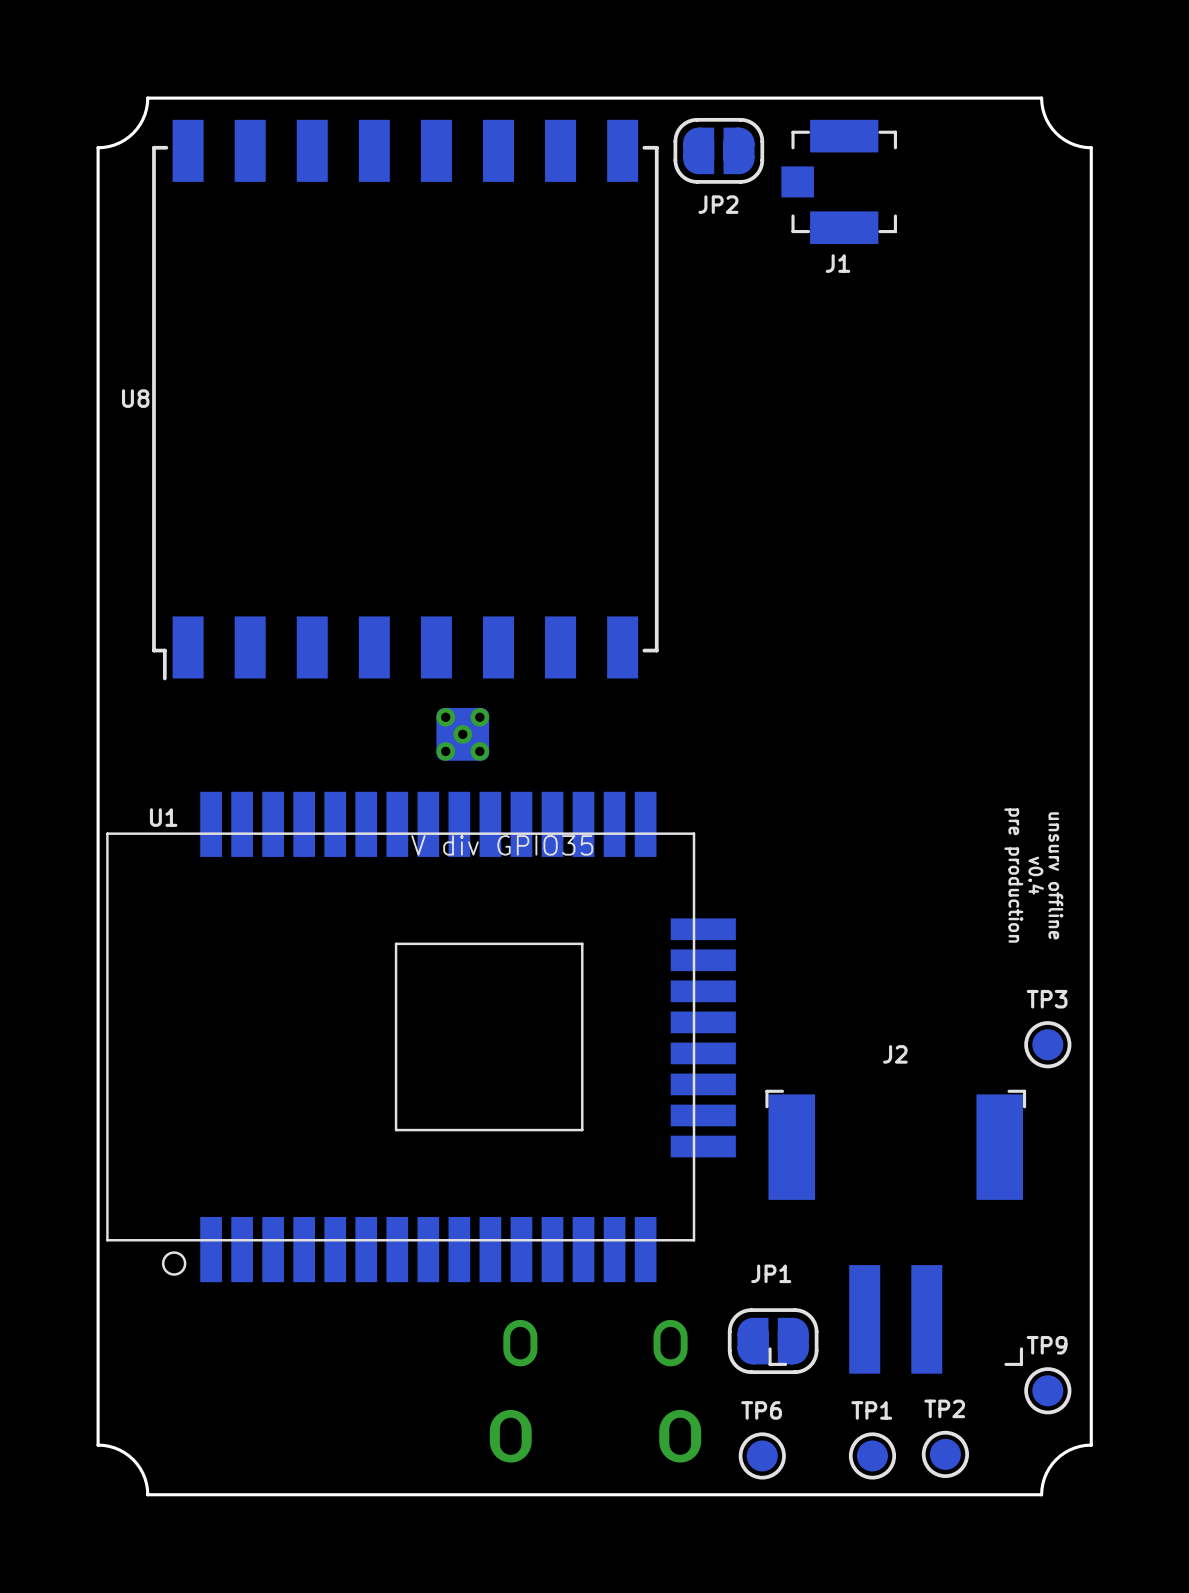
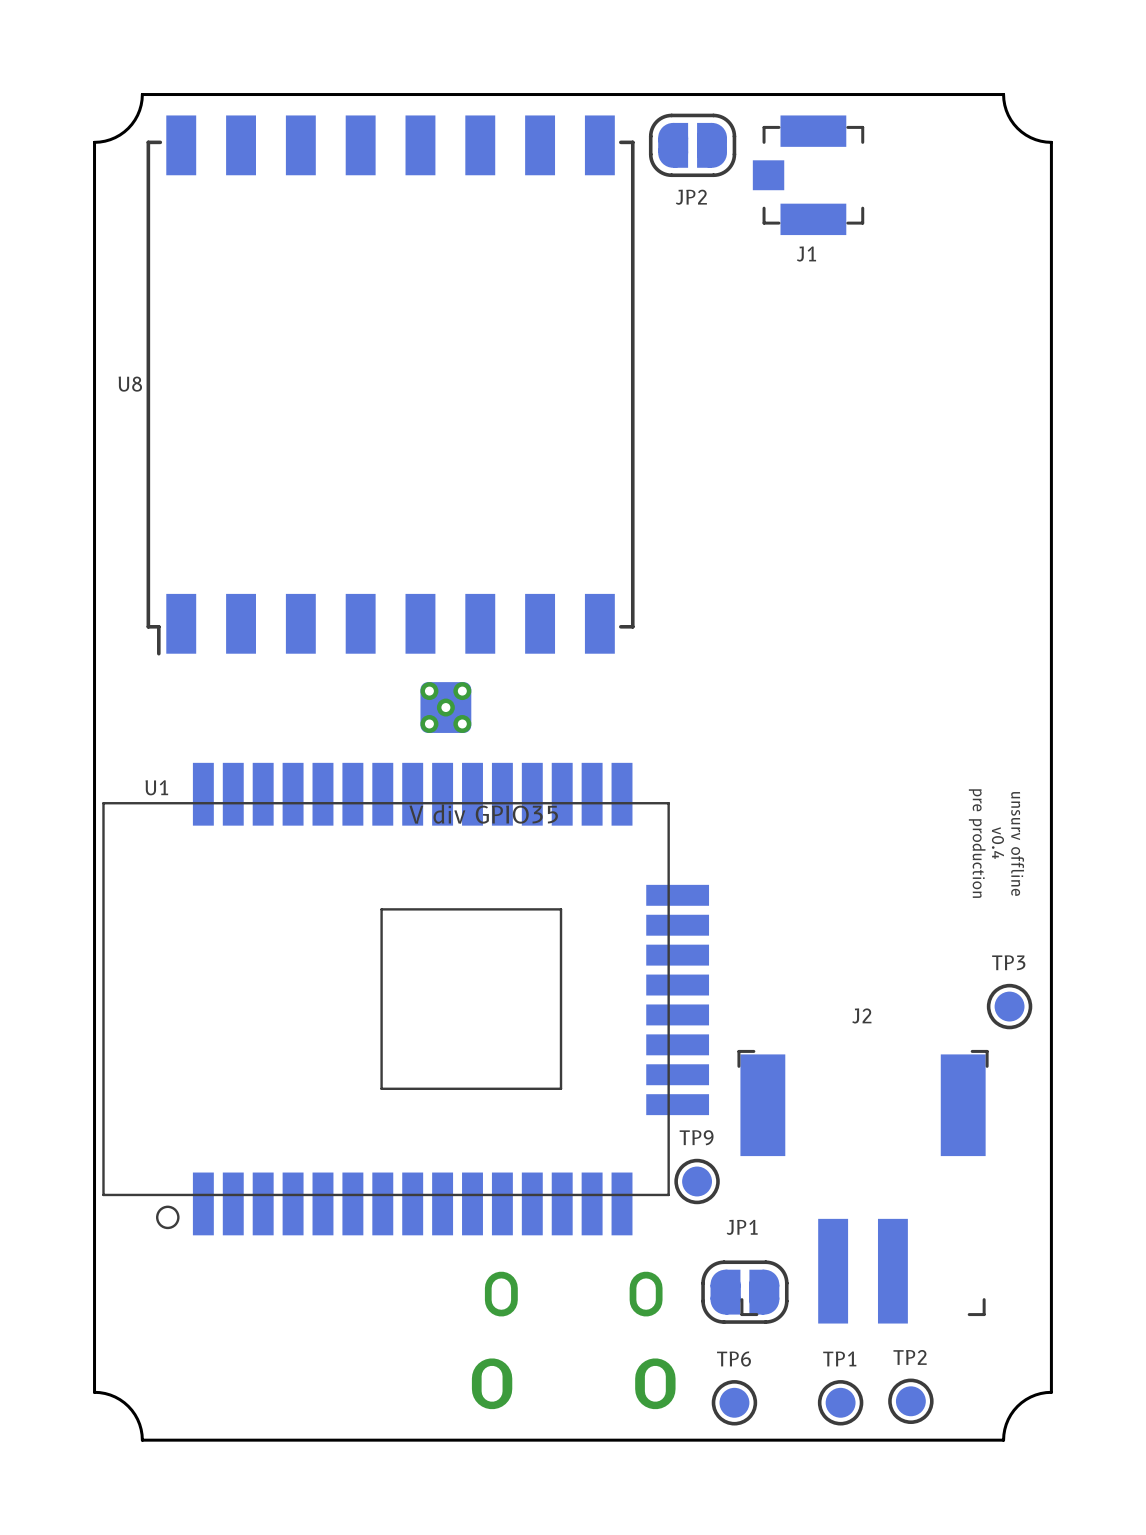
TP9 position: (1047, 1390) -> (697, 1181)

